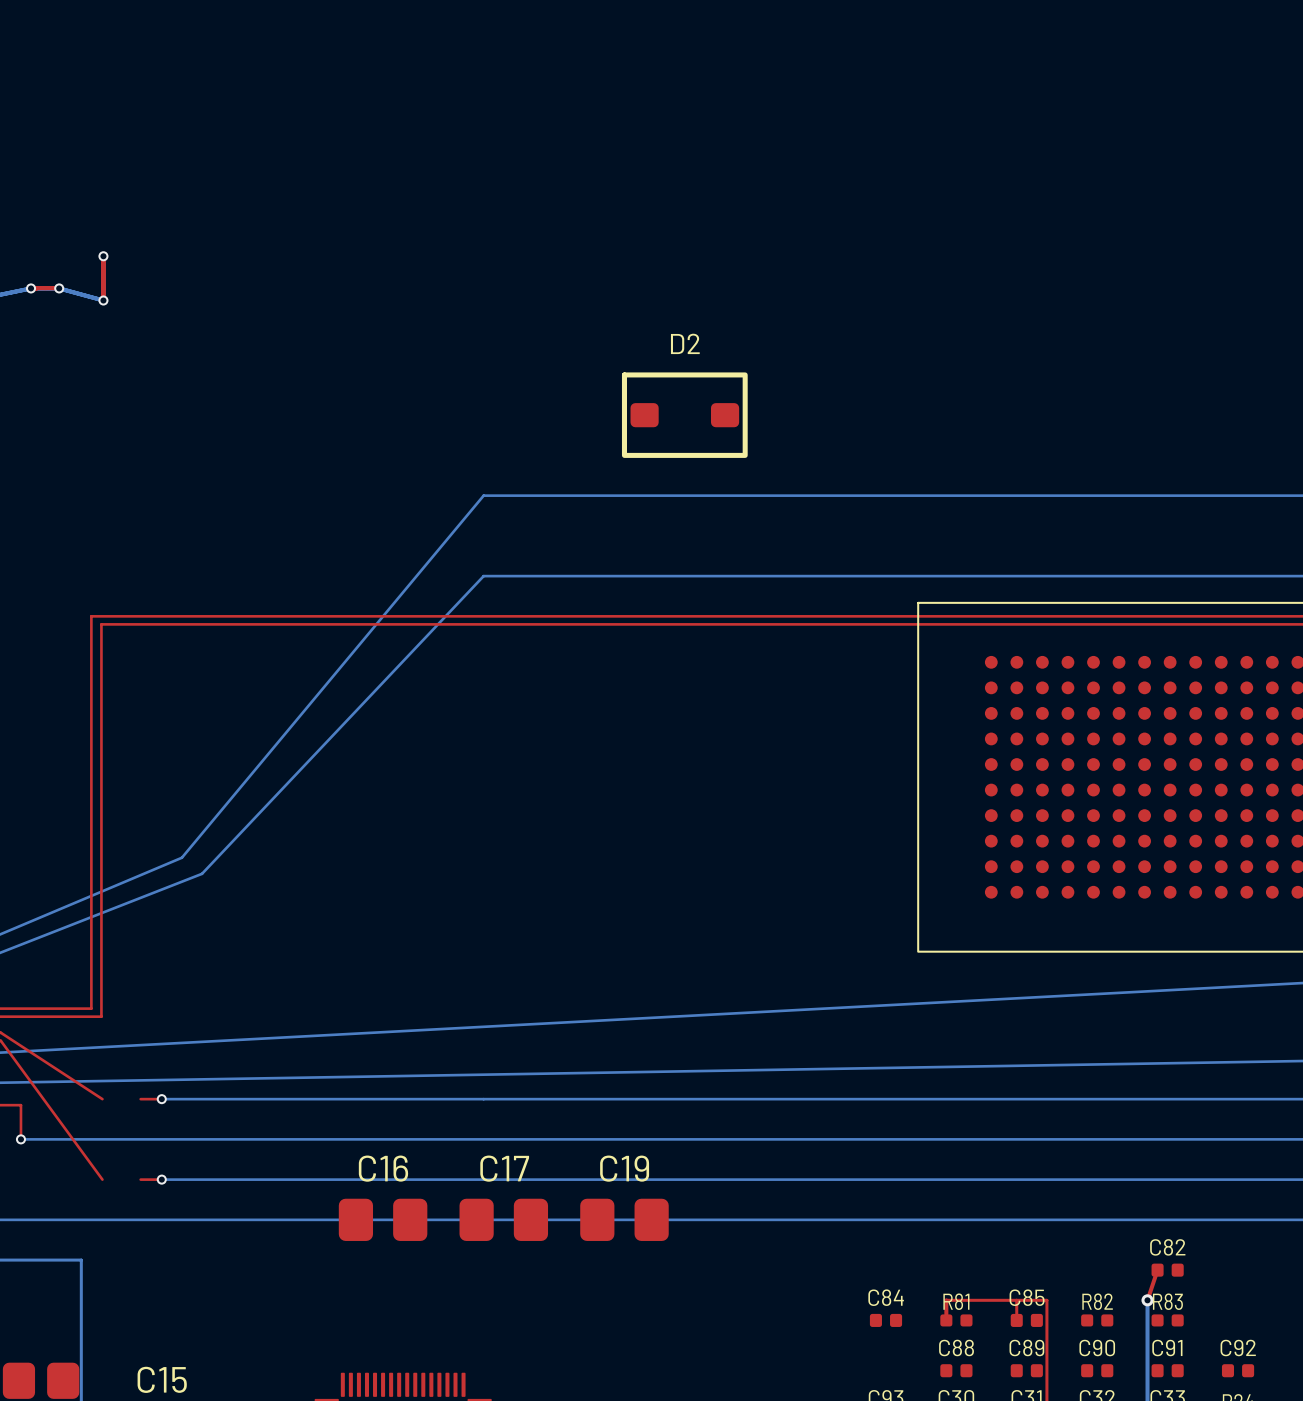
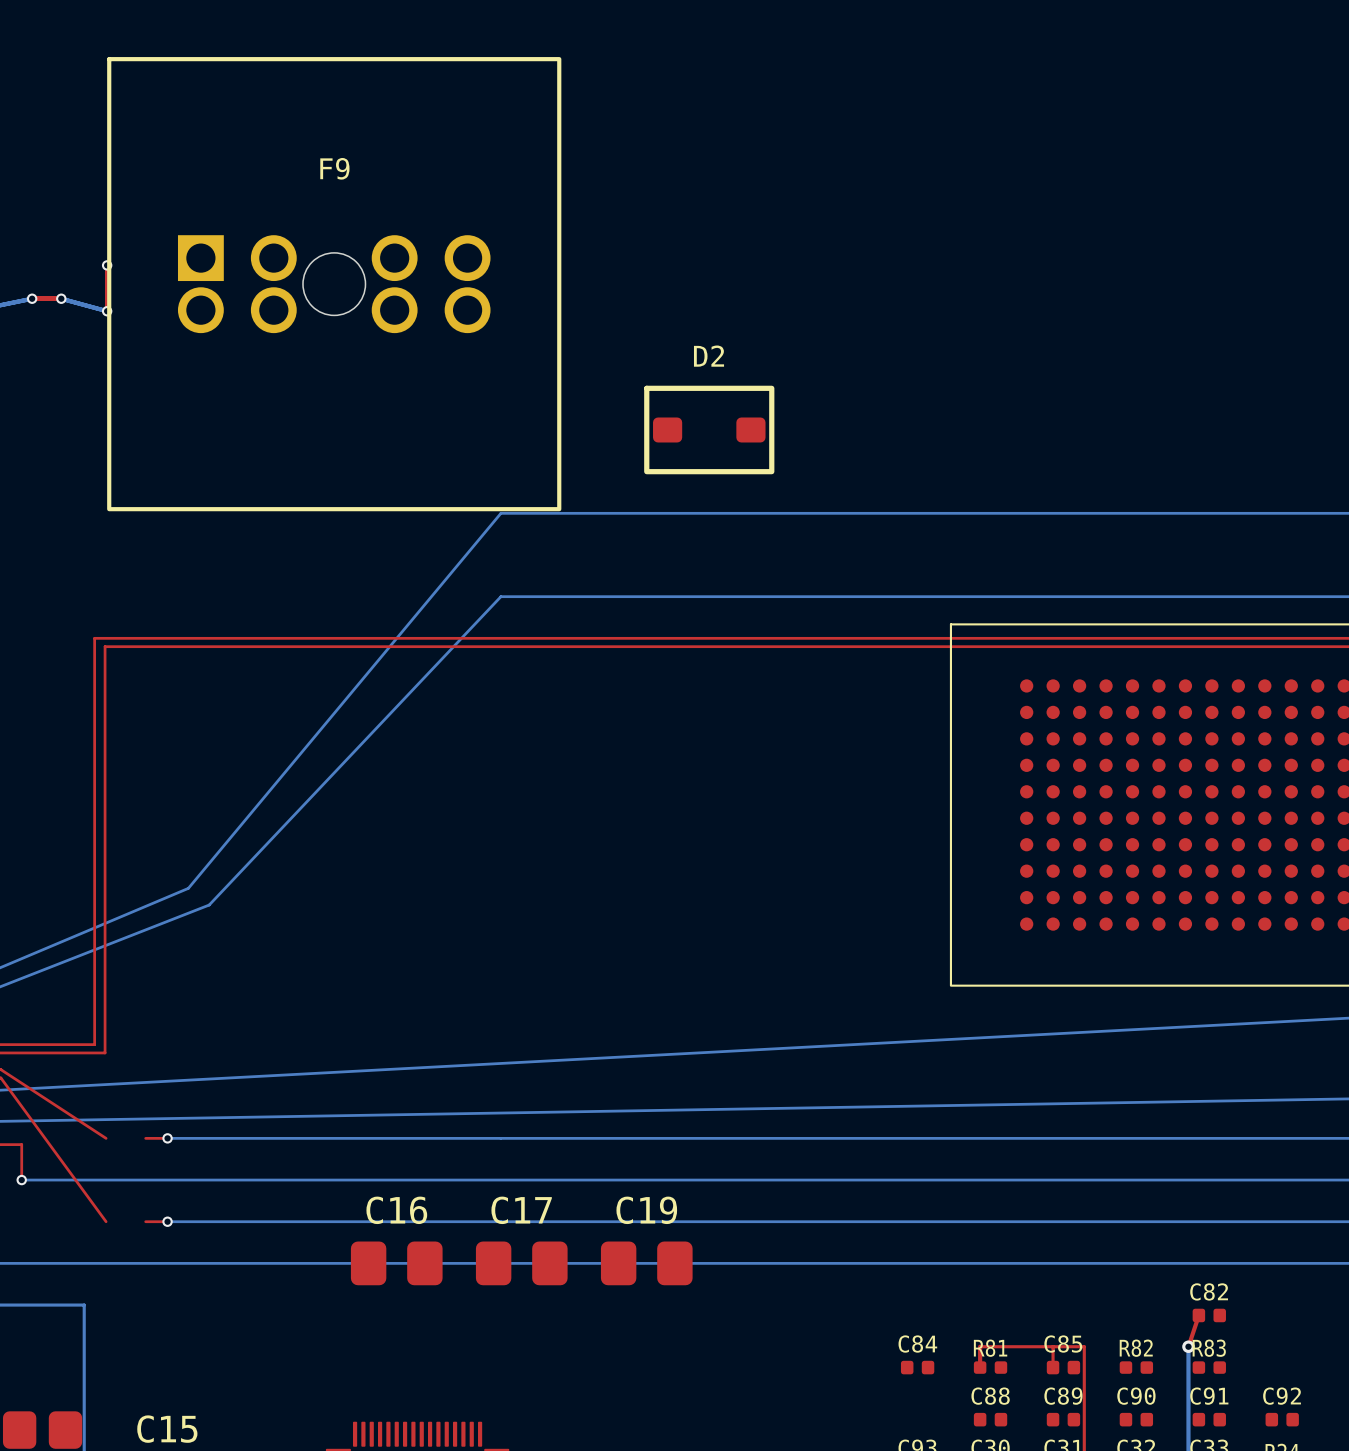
F9: none -> (334, 284)

